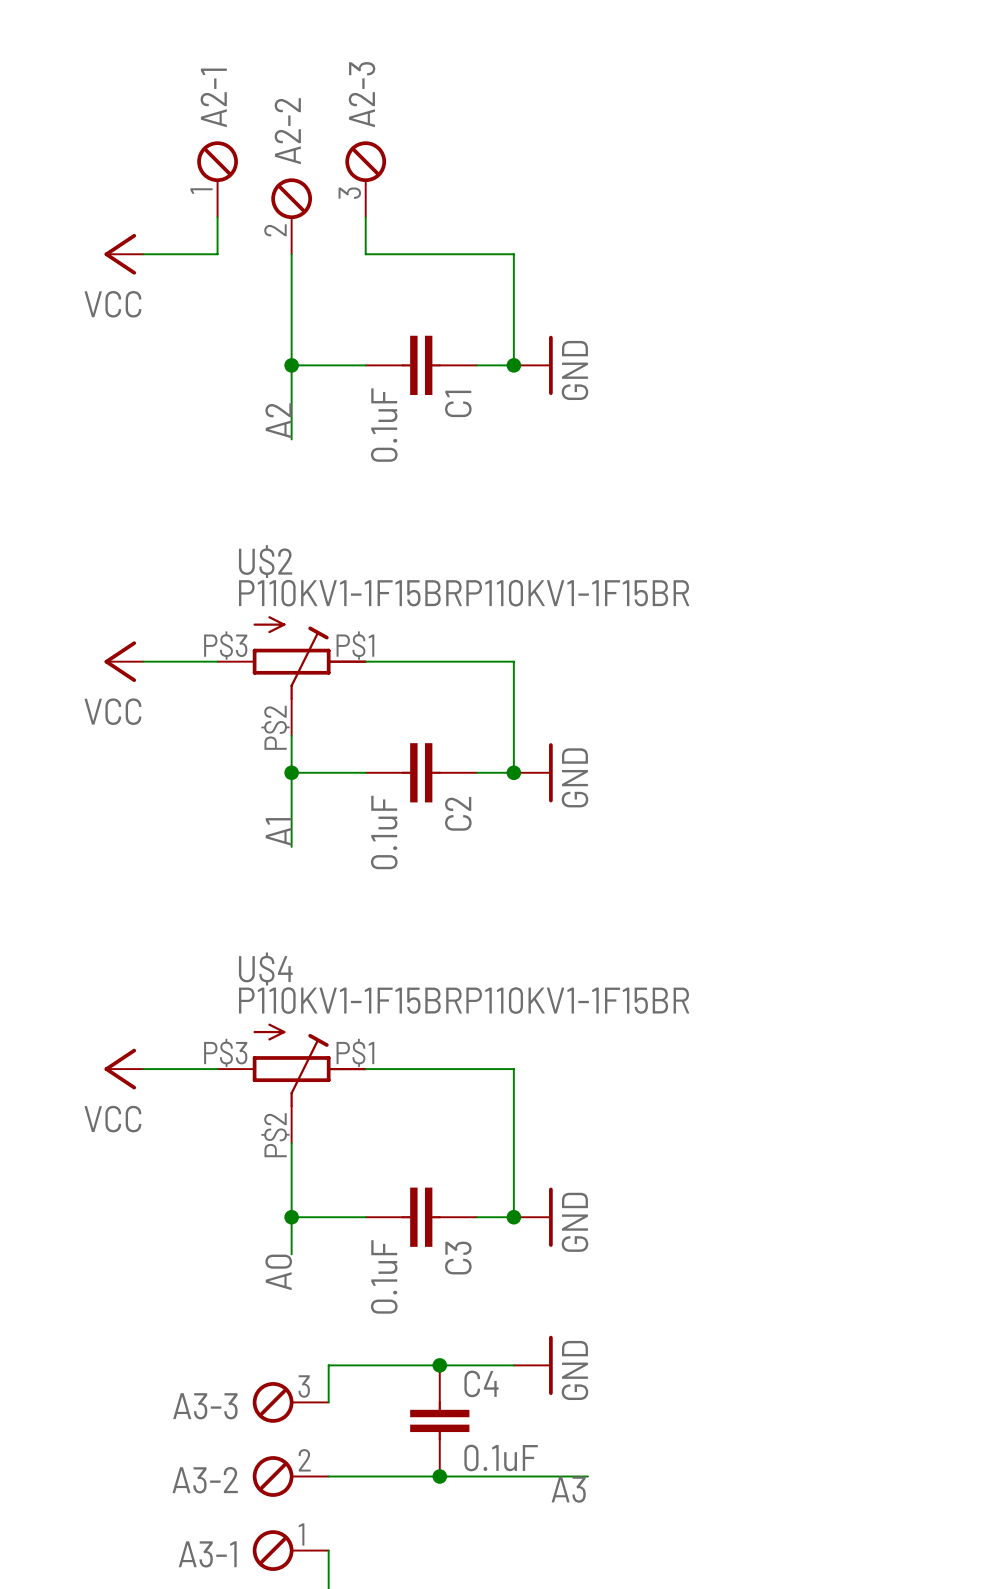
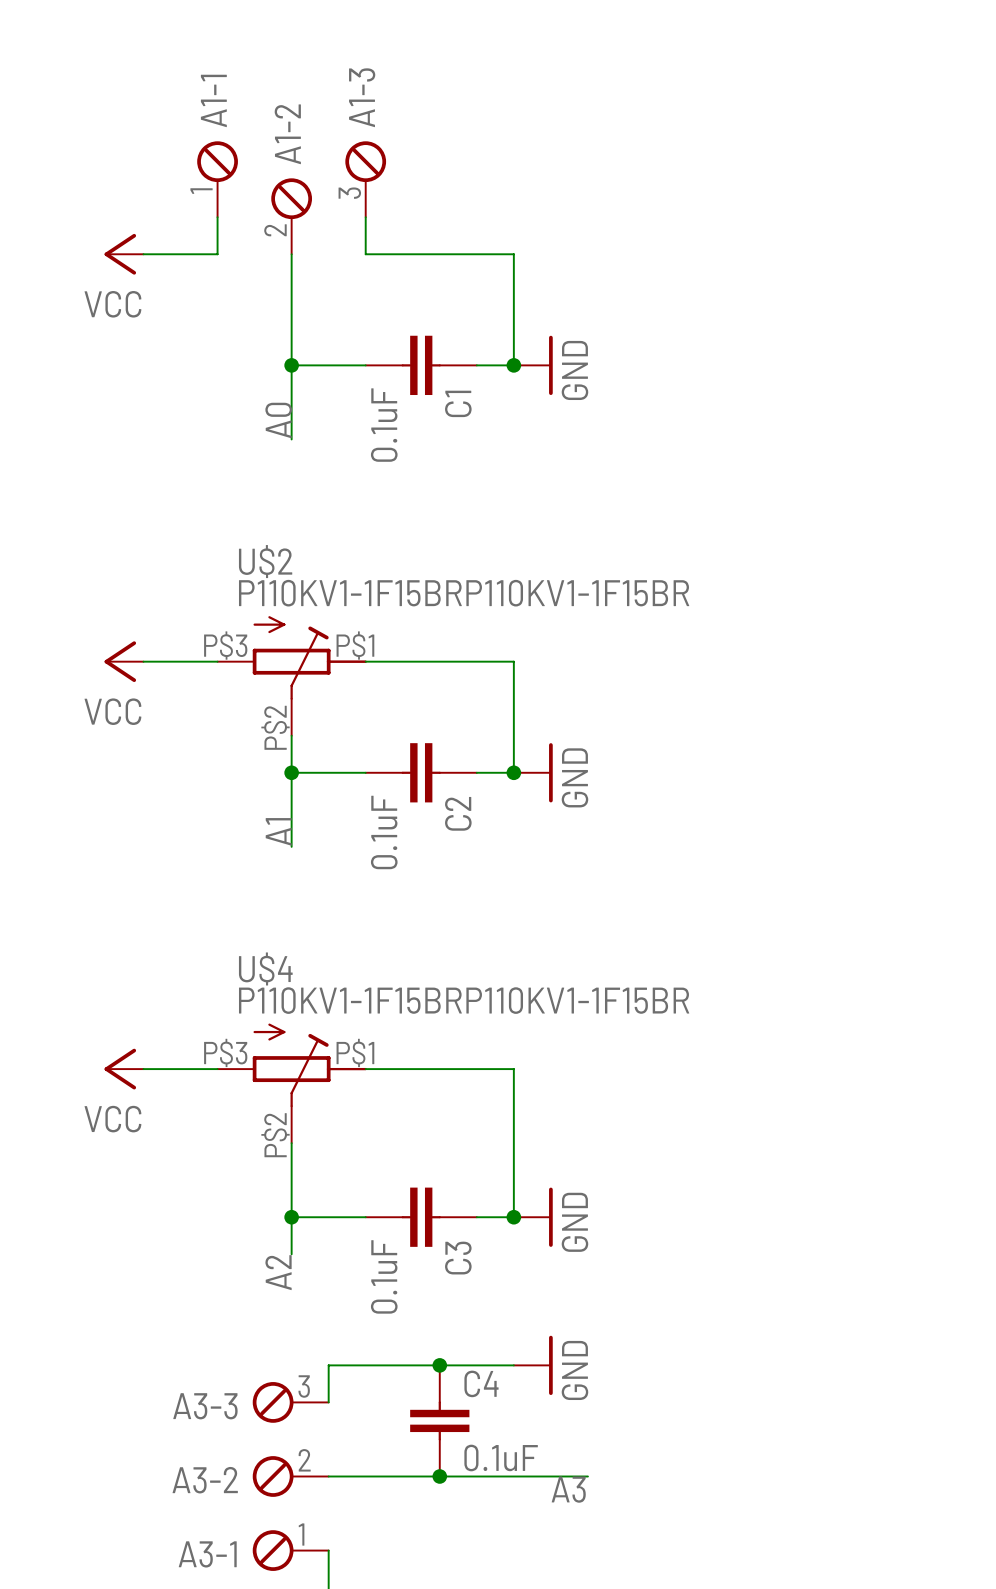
A2-3 name: A2-3 (362, 94) -> A1-3 (362, 97)
A2-1 name: A2-1 (213, 97) -> A1-1 (213, 100)
A2-2 name: A2-2 (287, 131) -> A1-2 (287, 134)
label: A2 (278, 420) -> A0 (278, 420)
label: A0 (278, 1272) -> A2 (278, 1272)

